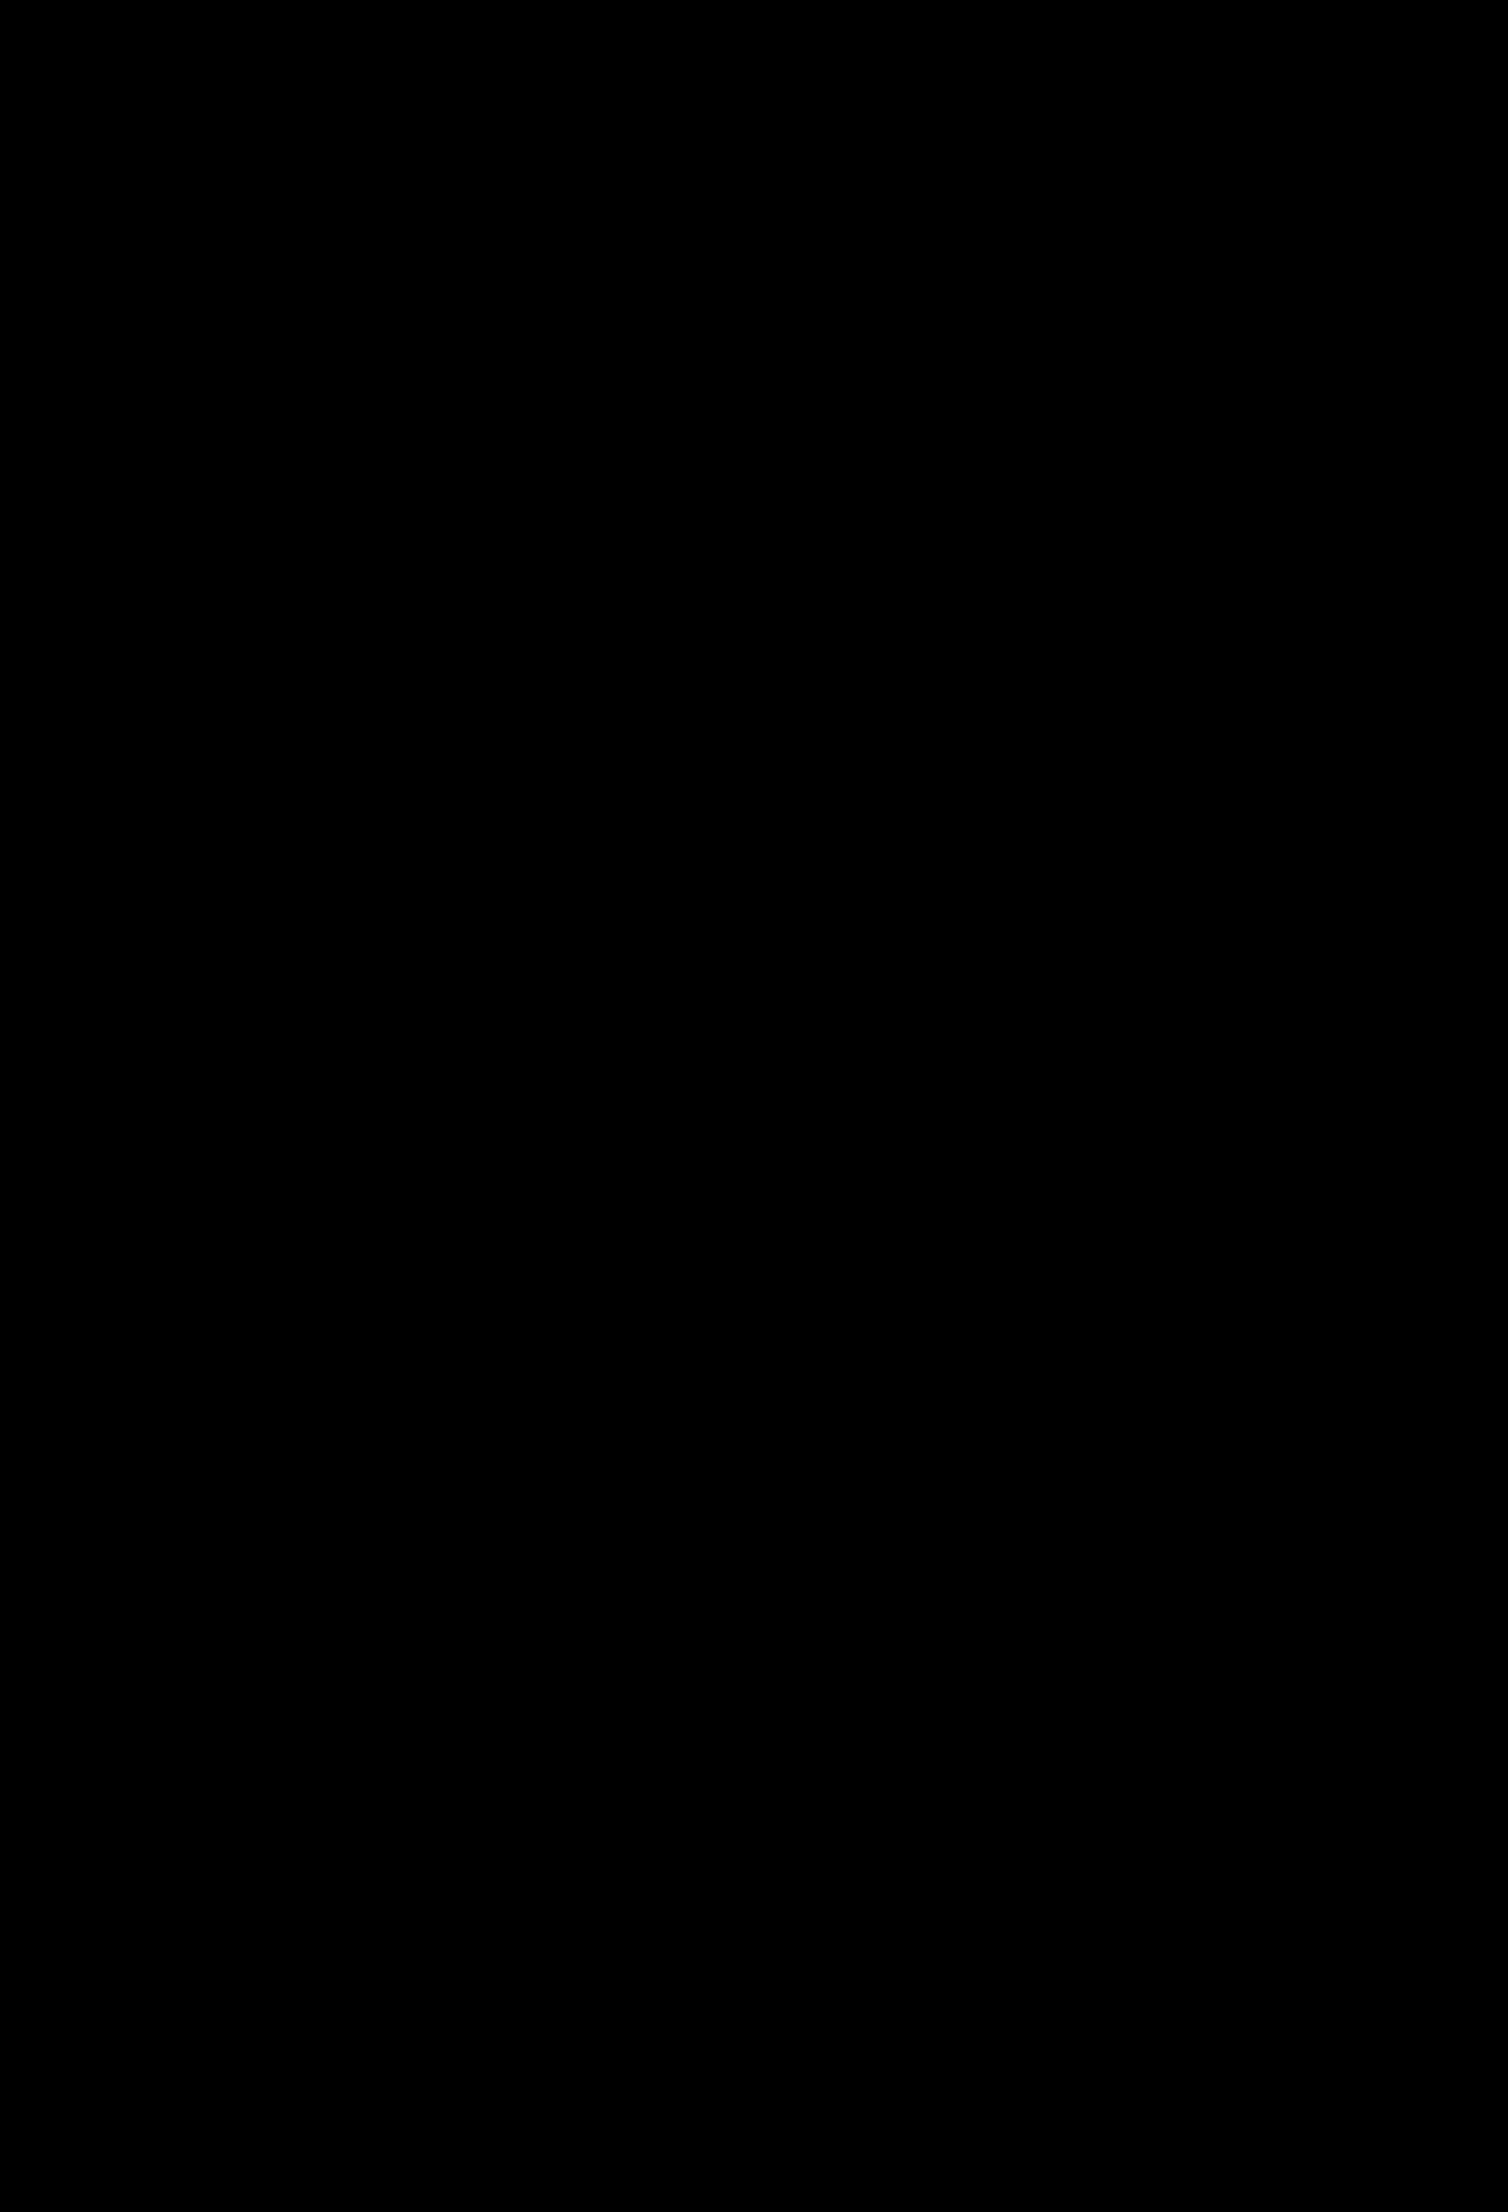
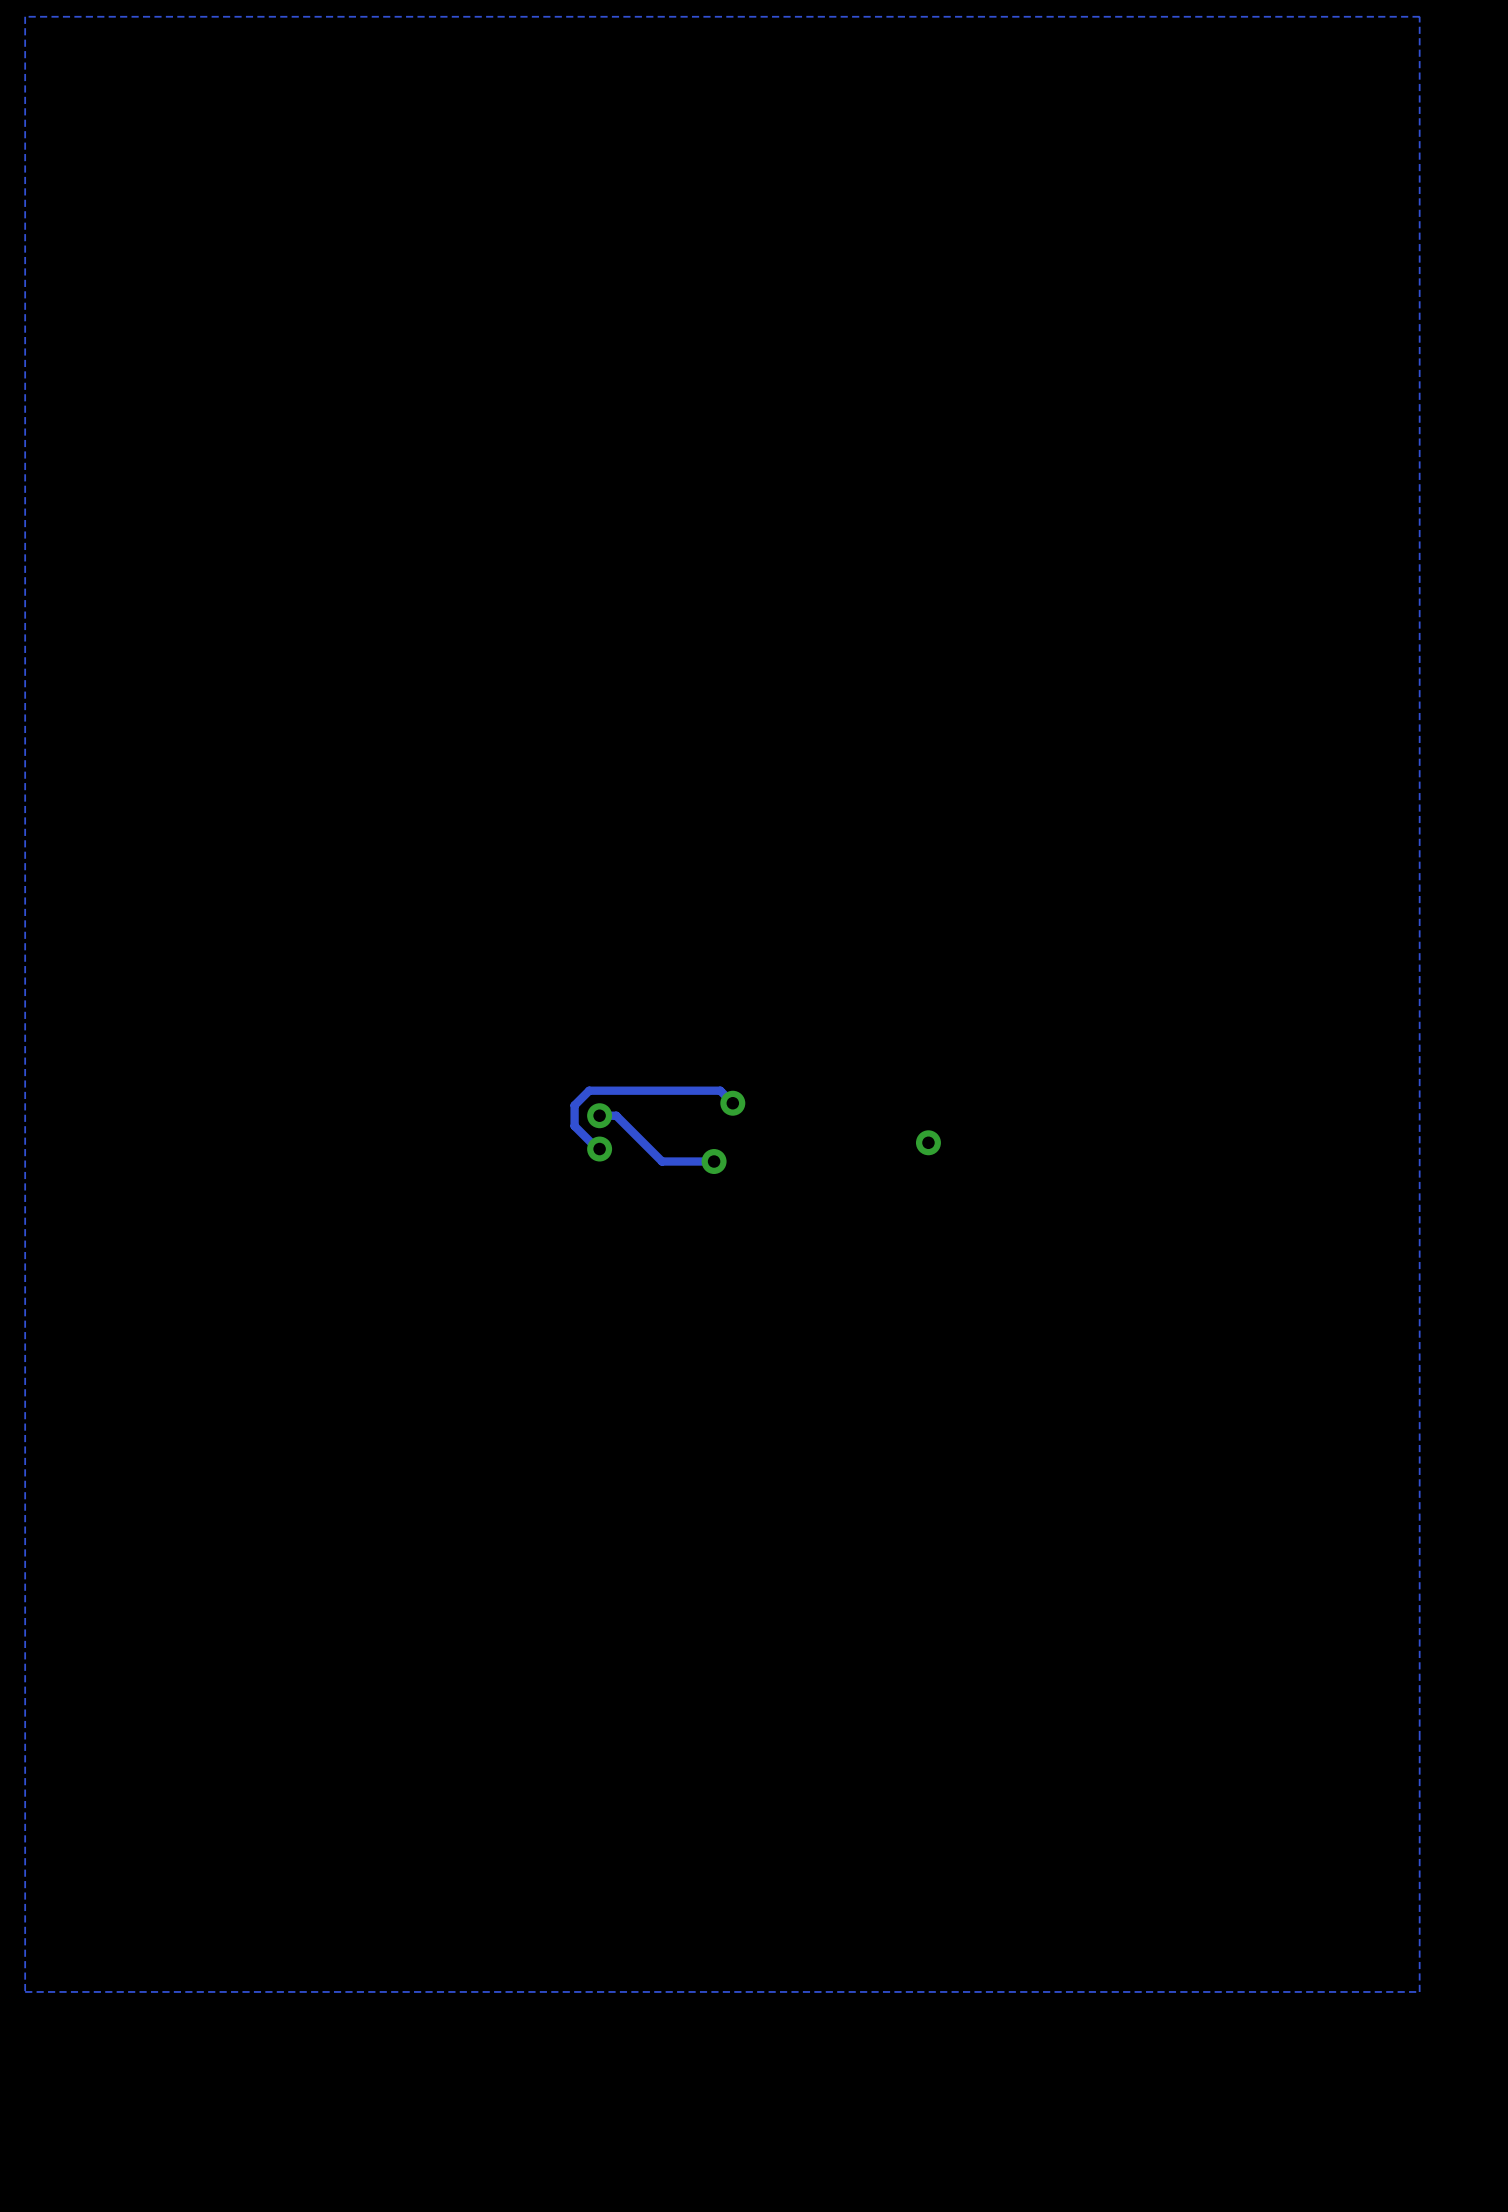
zone outline: none -> (1419, 16) (1419, 1991) (25, 1991) (25, 16) (1419, 16)
track: none -> (732, 1103) (720, 1090) (589, 1090) (574, 1105) (574, 1126) (599, 1149)
via: none -> (732, 1103)
track: none -> (599, 1115) (616, 1115) (662, 1161) (714, 1161)
via: none -> (599, 1115)
via: none -> (928, 1142)
via: none -> (599, 1149)
via: none -> (714, 1161)

